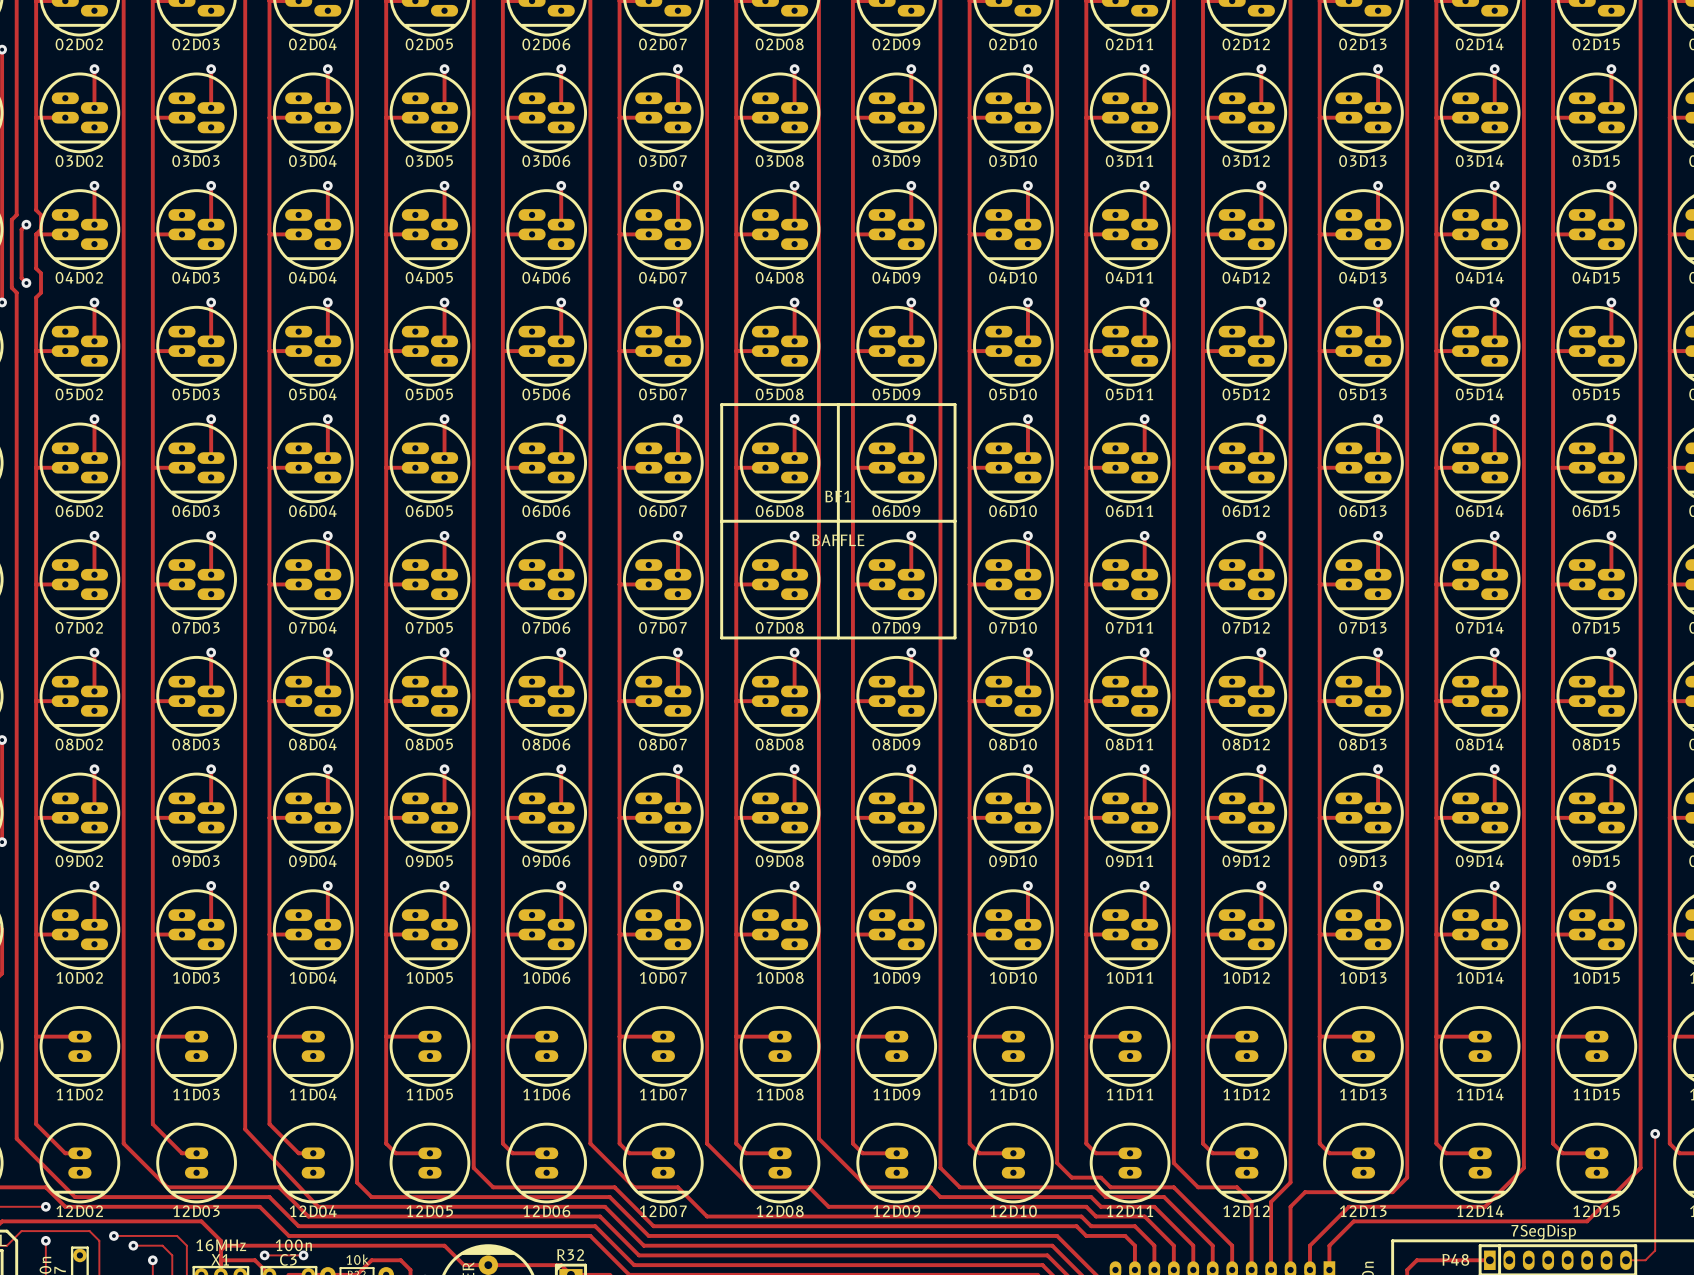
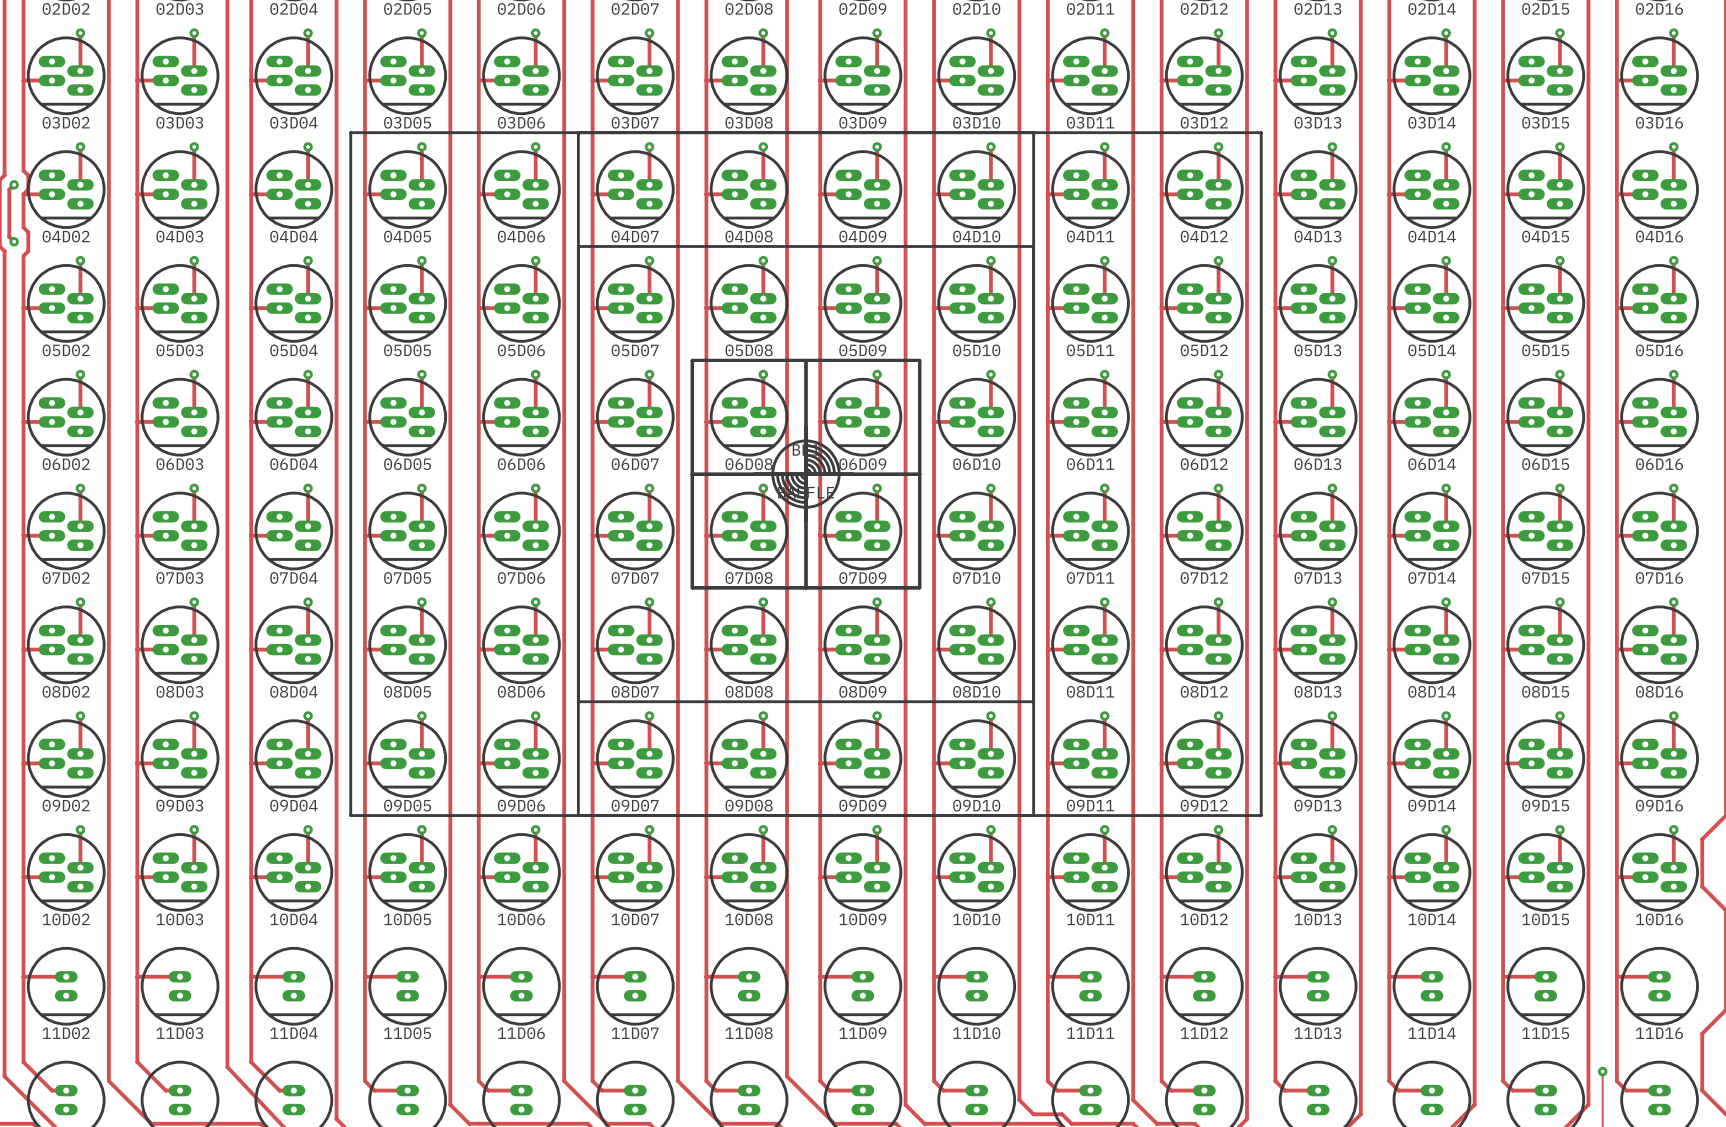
drawing: none -> [349, 131, 1263, 817]

